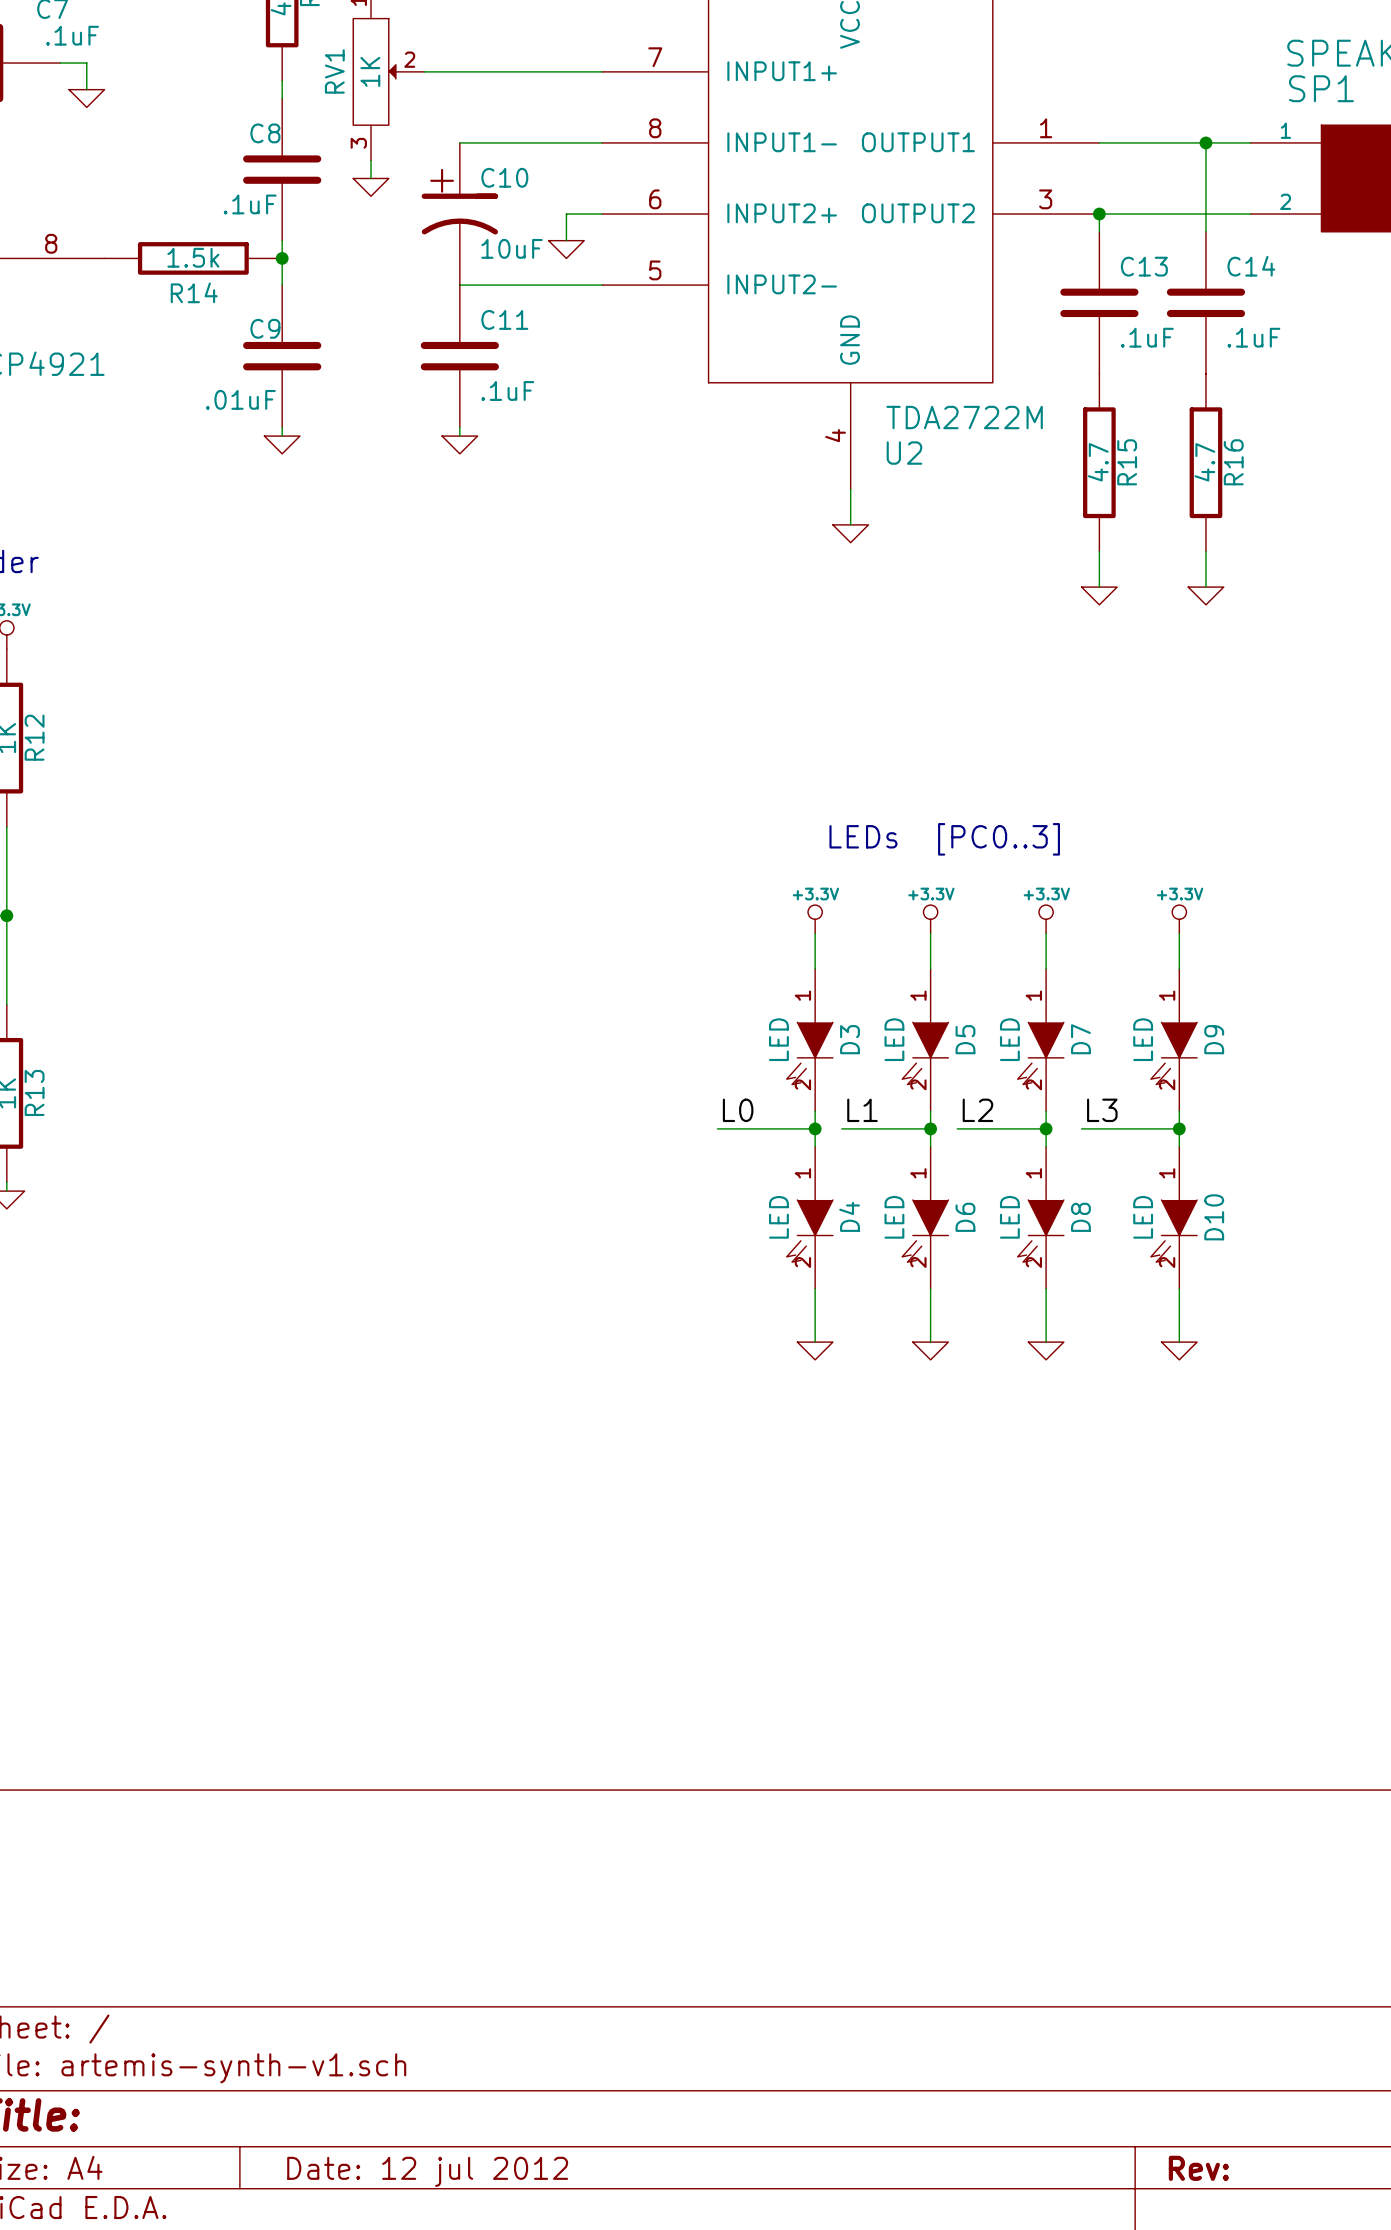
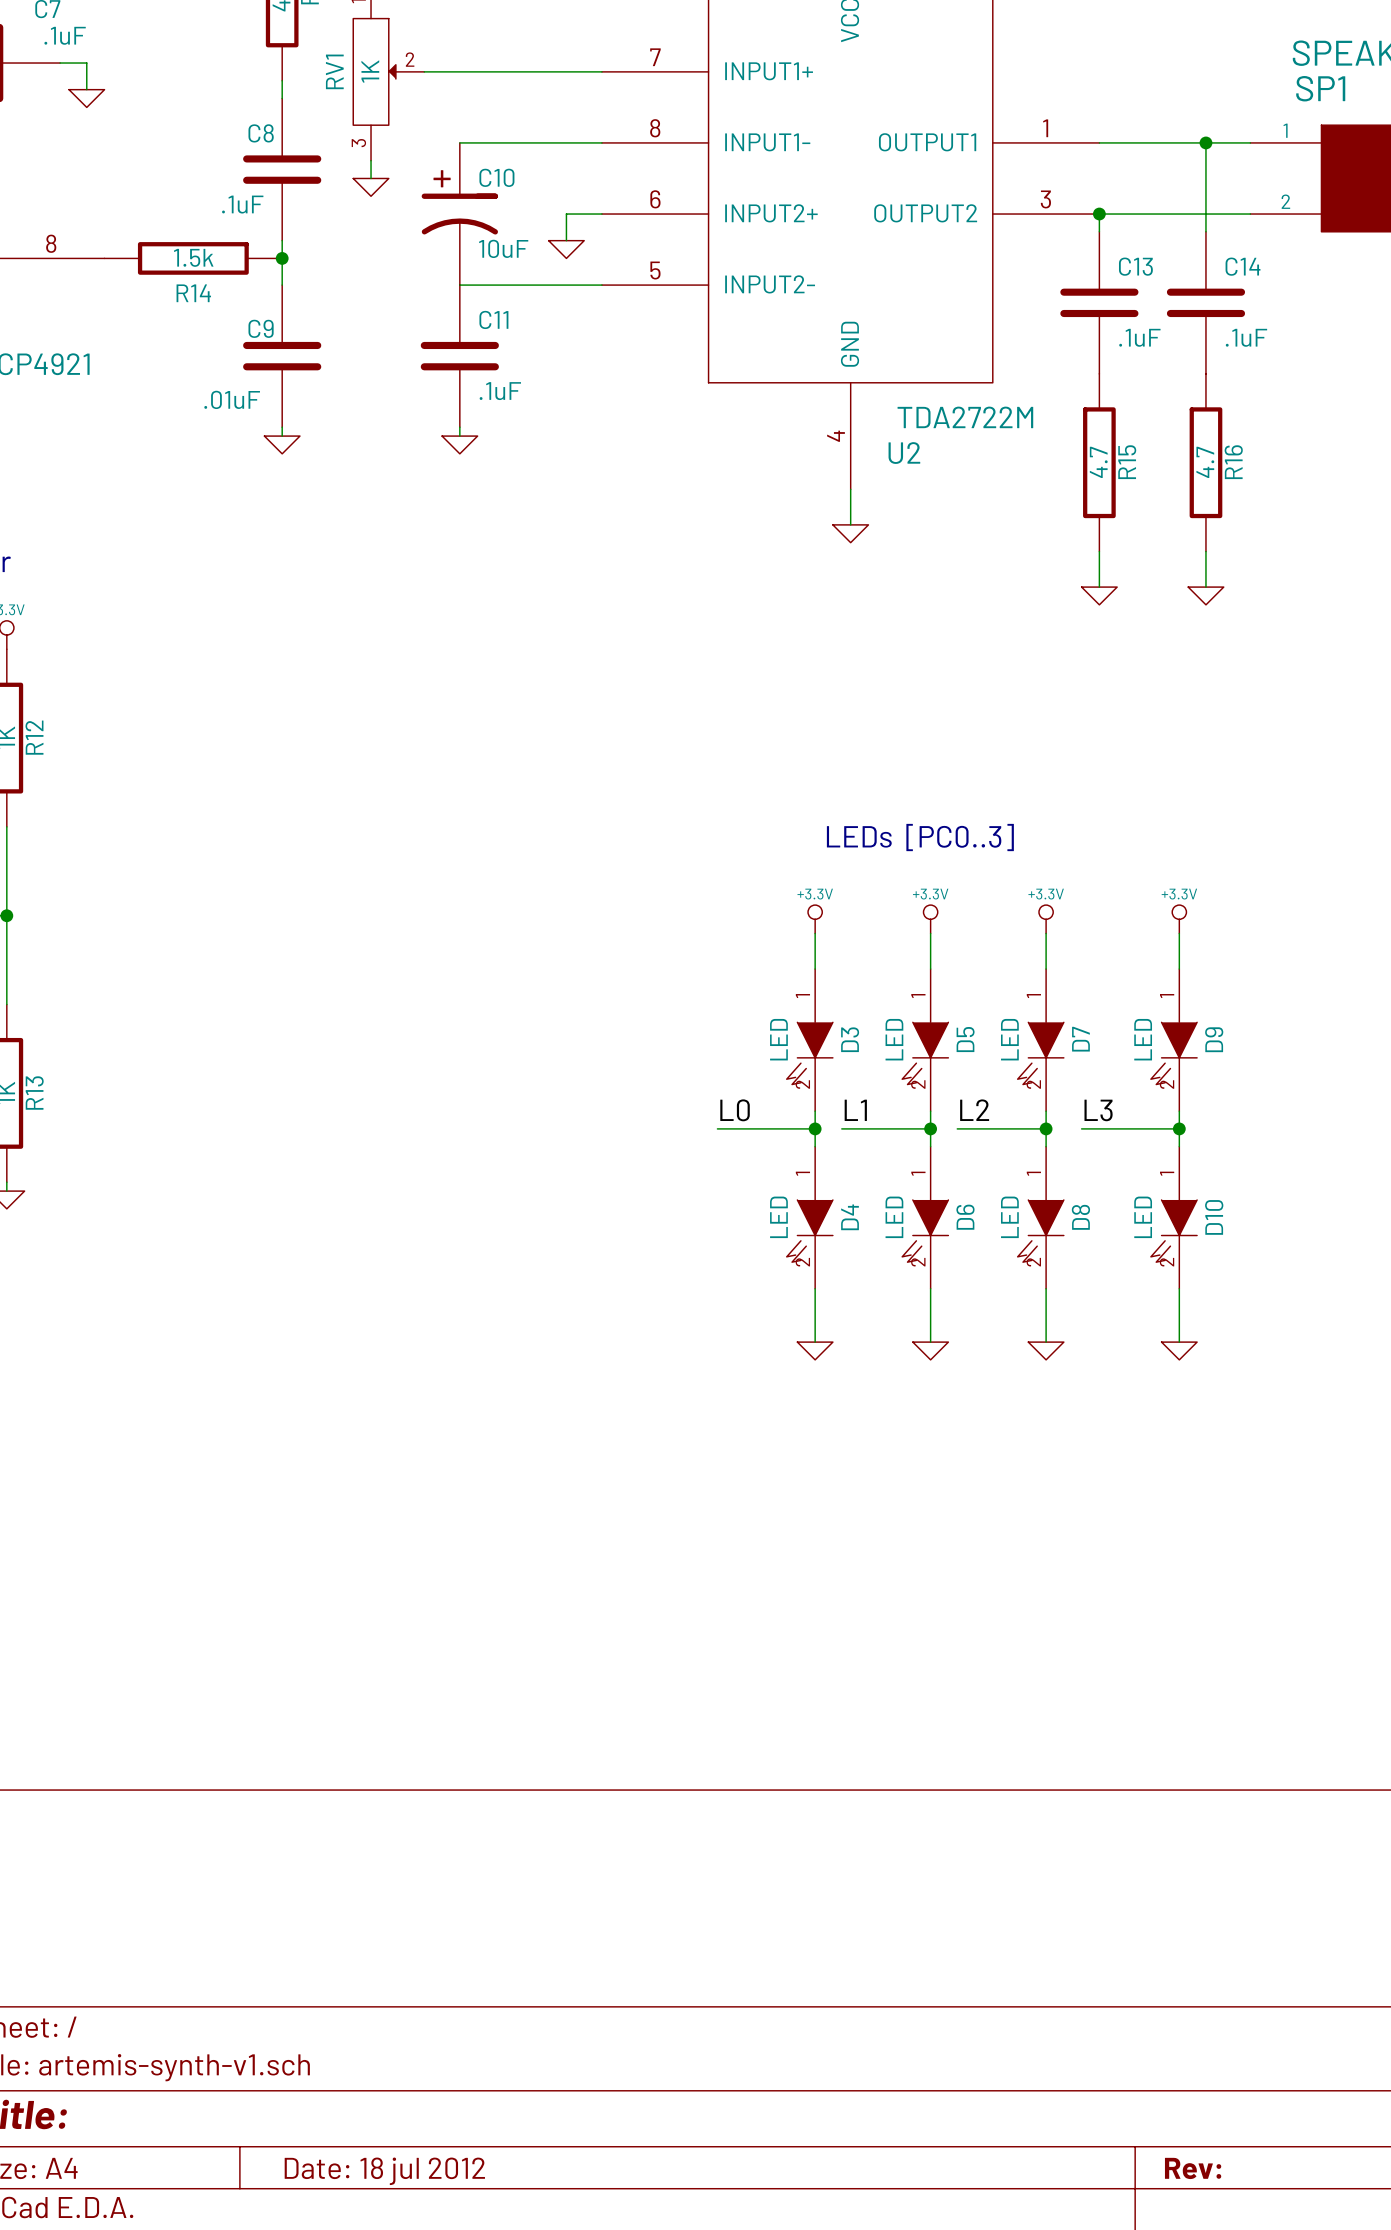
title block: Date: 12 jul 2012 (427, 2171) -> Date: 18 jul 2012 (384, 2171)

